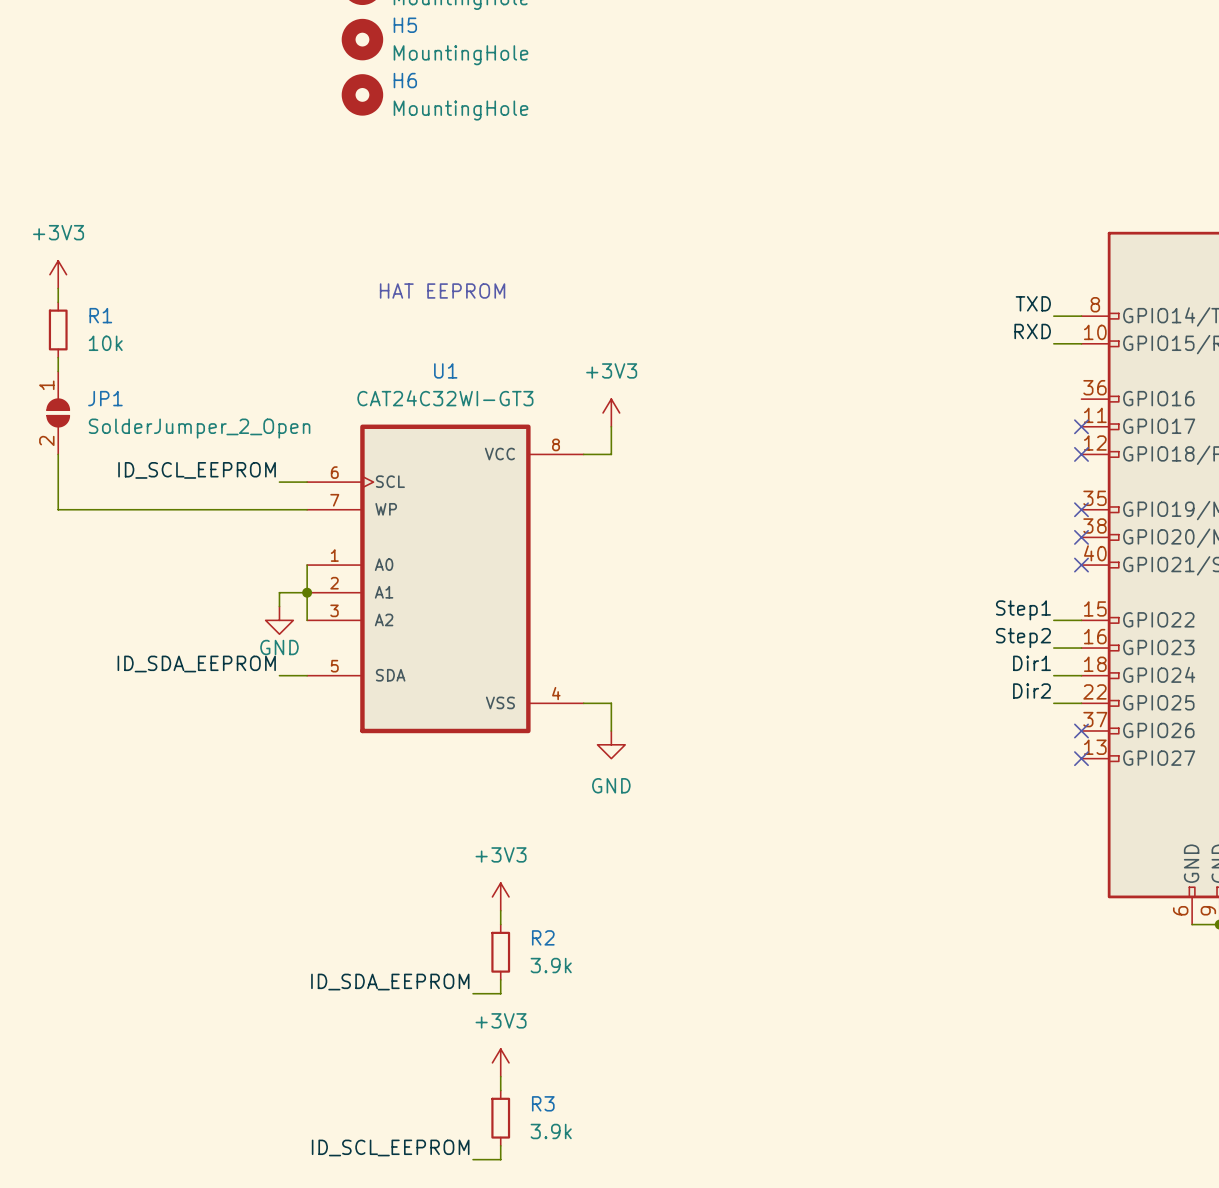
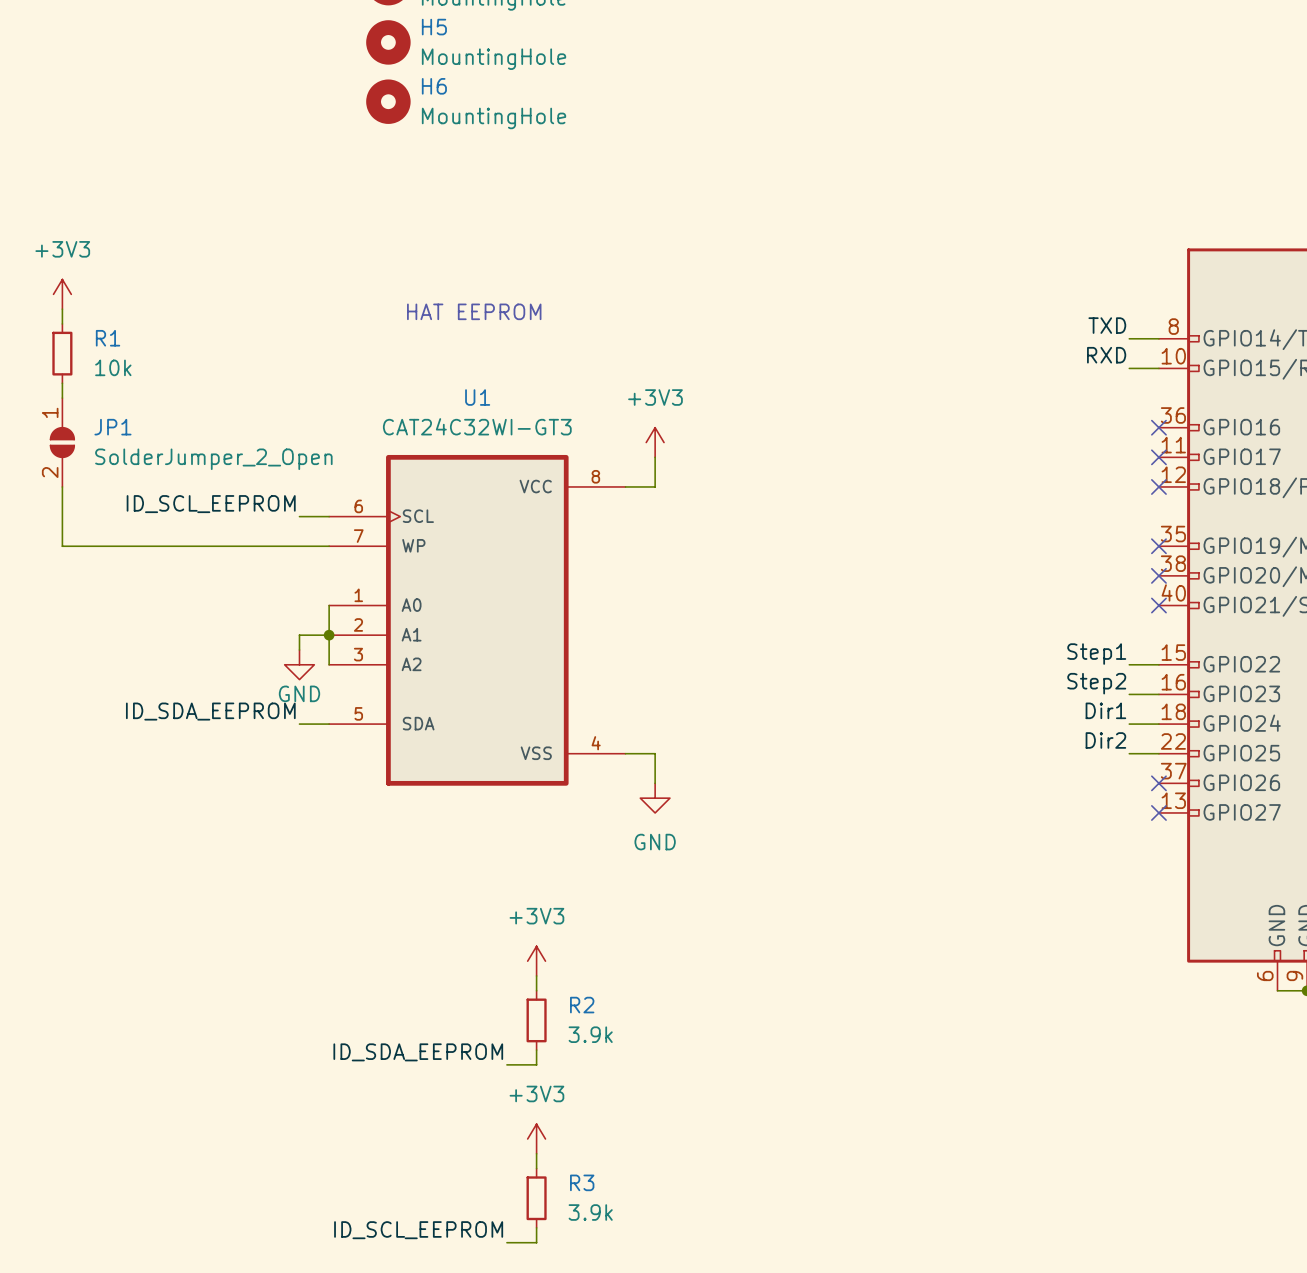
no-connect mark: none -> (1158, 427)

